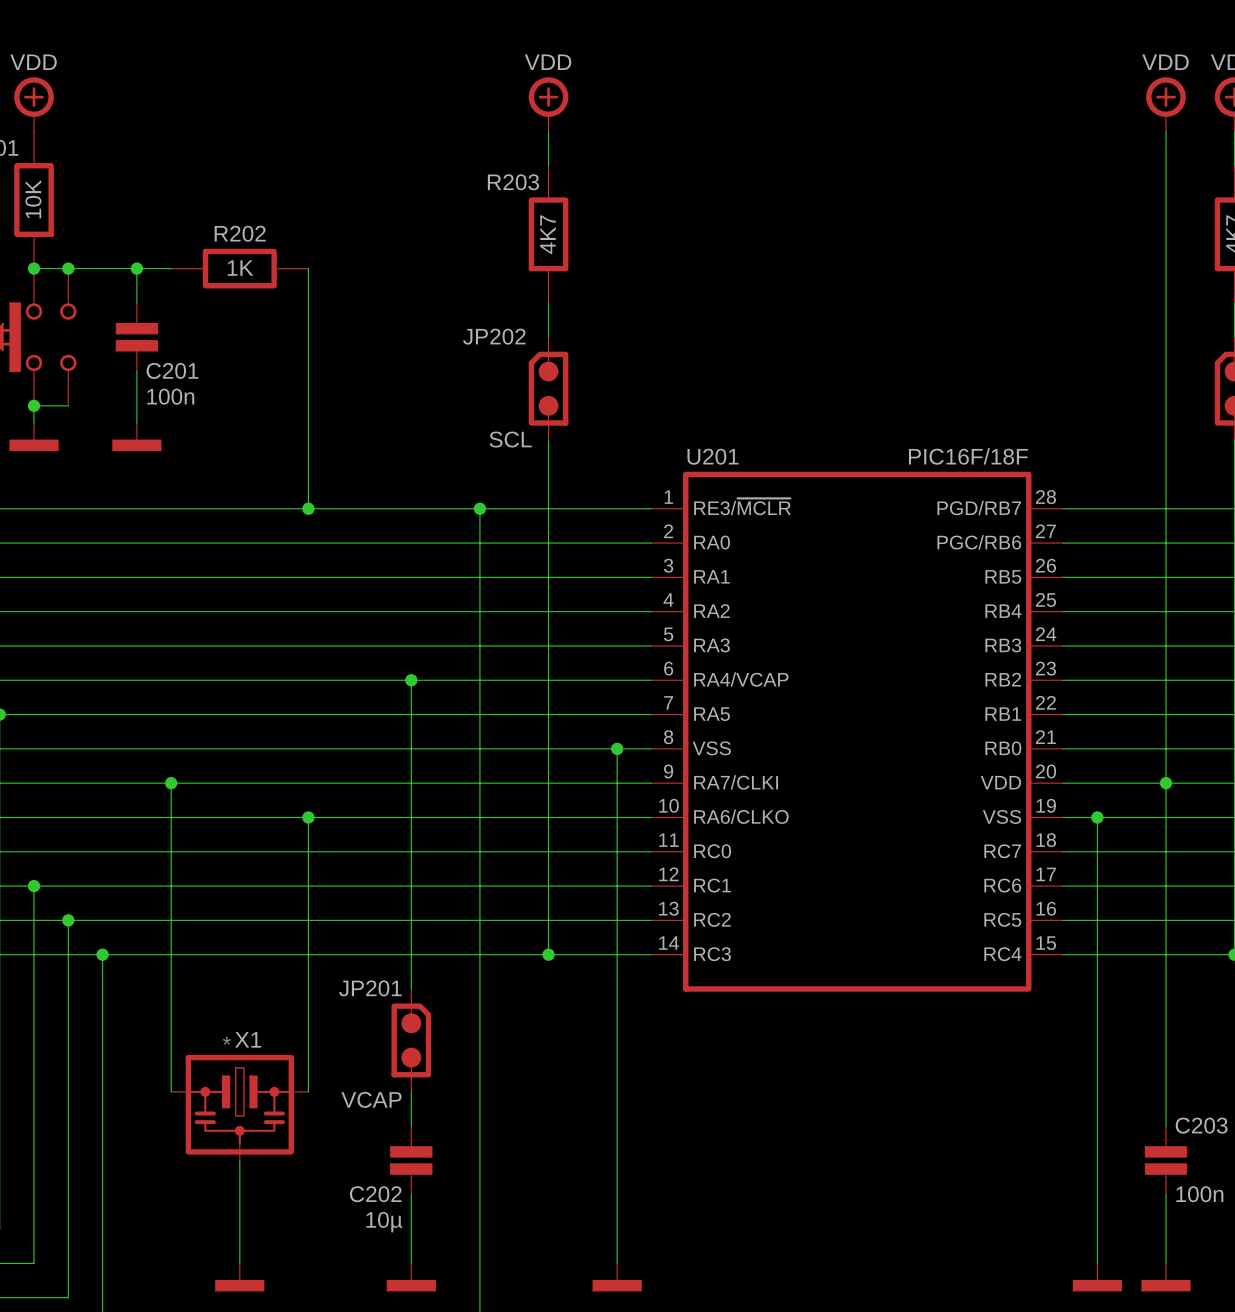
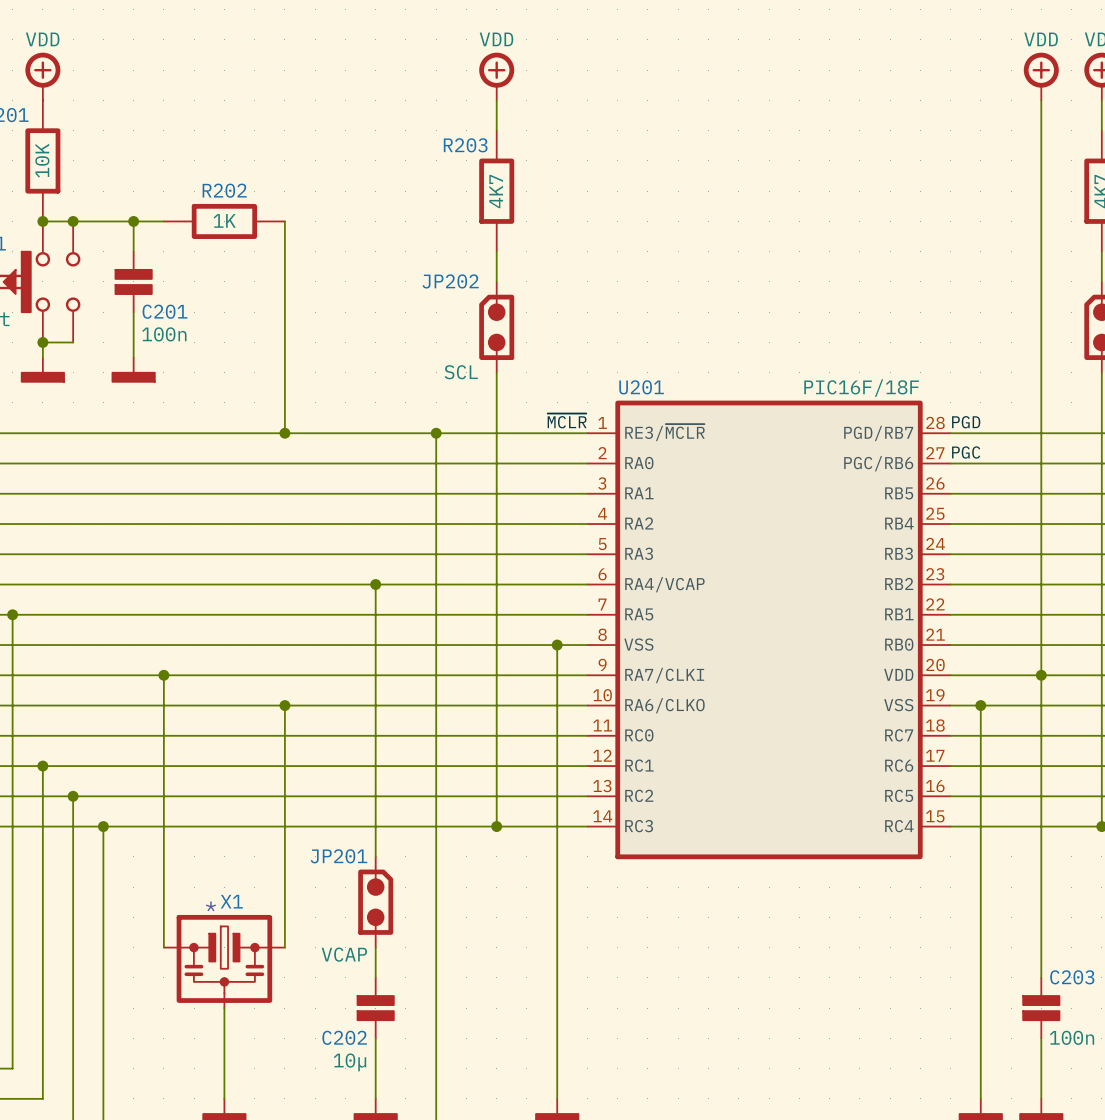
label: none -> ~{MCLR} (567, 420)
label: none -> PGD (966, 422)
label: none -> PGC (966, 452)

